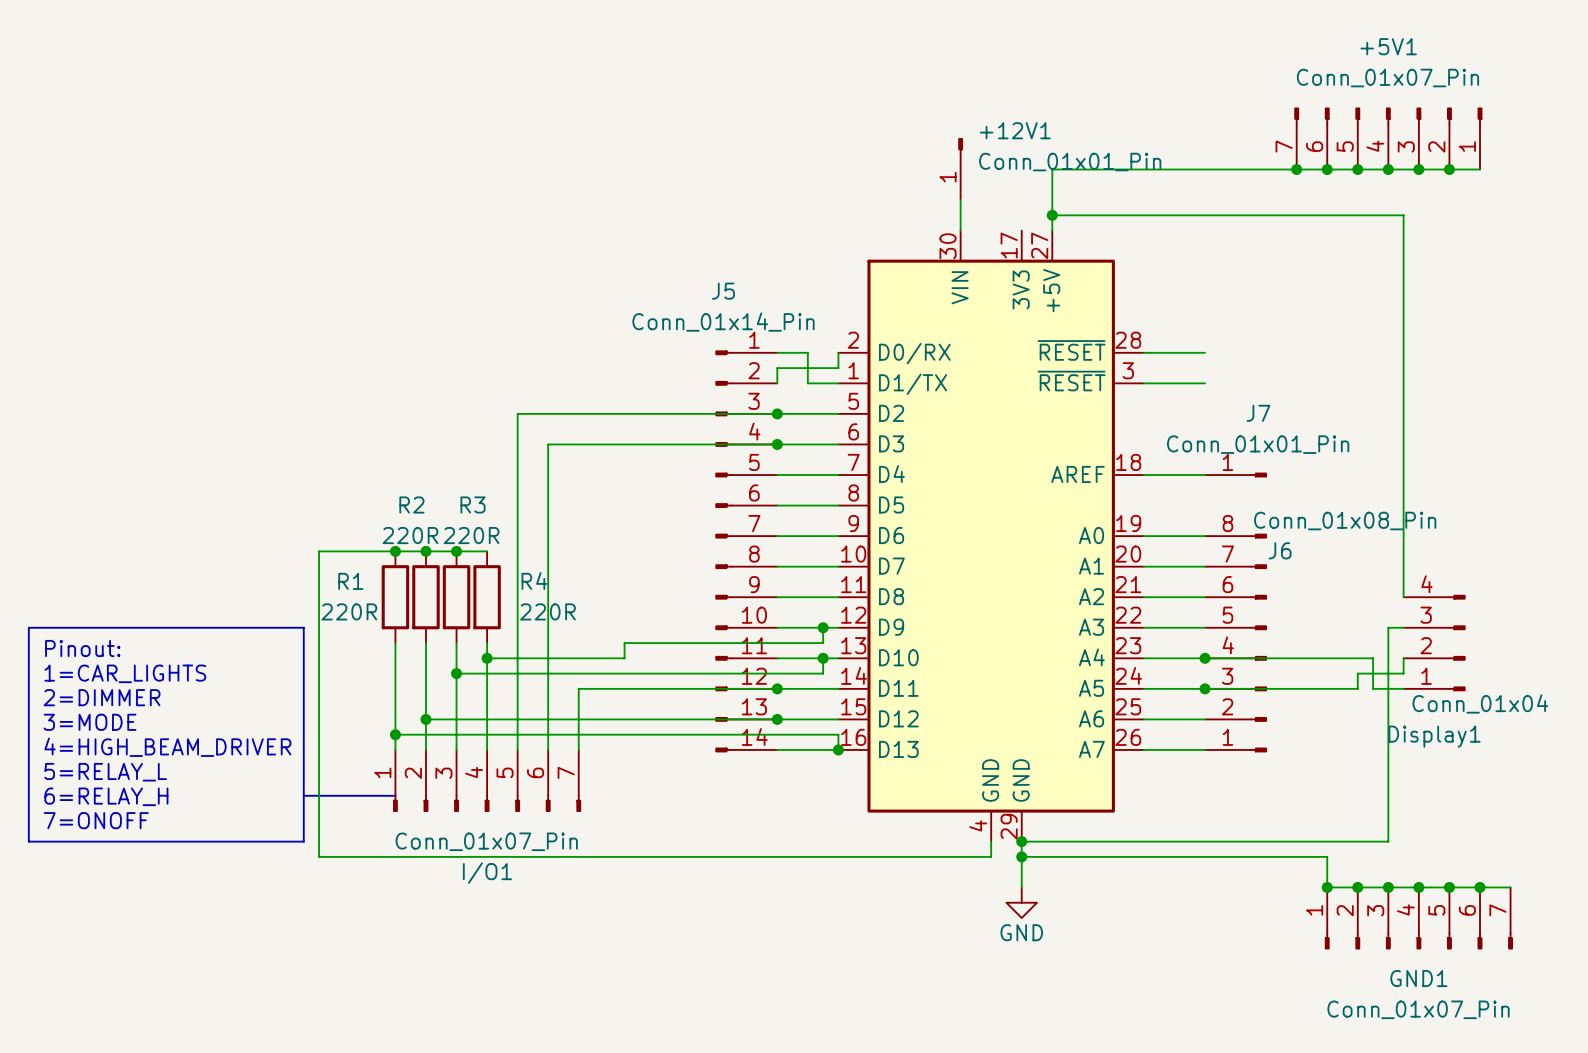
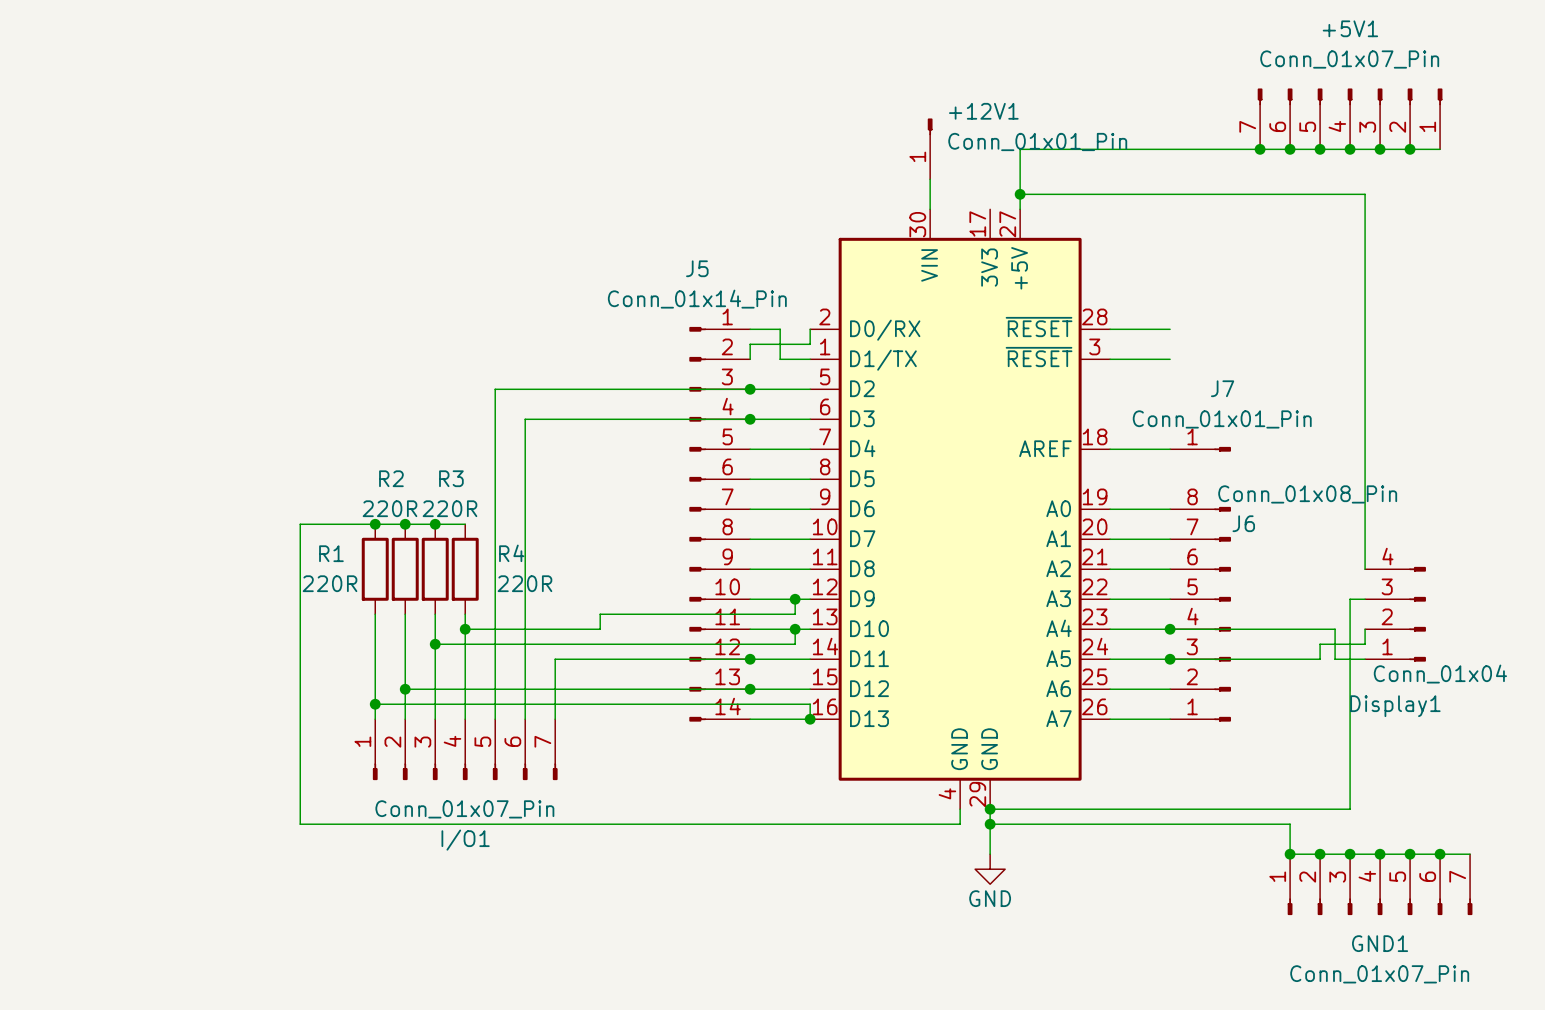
line: (28, 627) (303, 627) (303, 841) (28, 841) (28, 627) -> none
text: Pinout: (82, 648) -> none
text: 1=CAR_LIGHTS (125, 673) -> none
text: 2=DIMMER (102, 697) -> none
text: 3=MODE (90, 722) -> none
text: 4=HIGH_BEAM_DRIVER (167, 747) -> none
text: 5=RELAY_L (105, 772) -> none
line: (303, 795) (395, 795) -> none
text: 6=RELAY_H (106, 796) -> none
text: 7=ONOFF (96, 820) -> none

